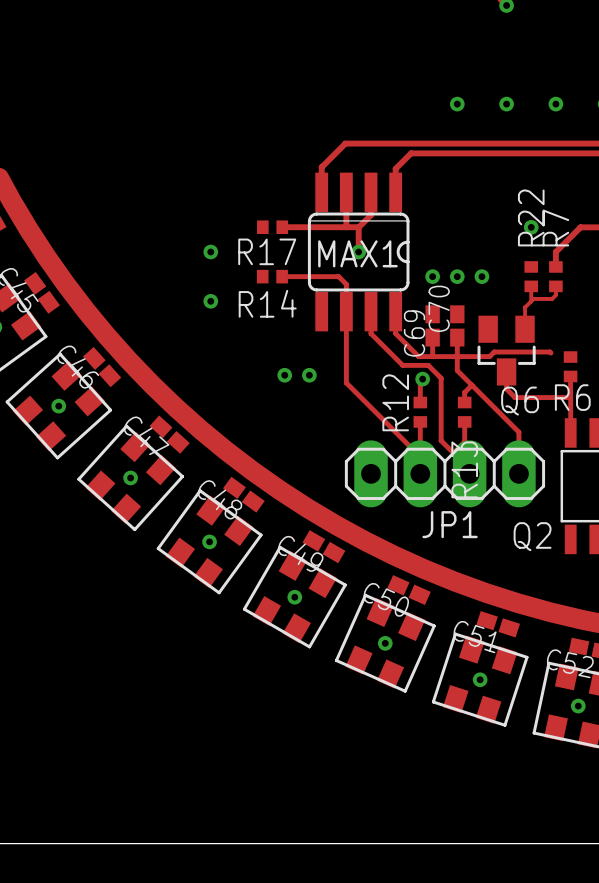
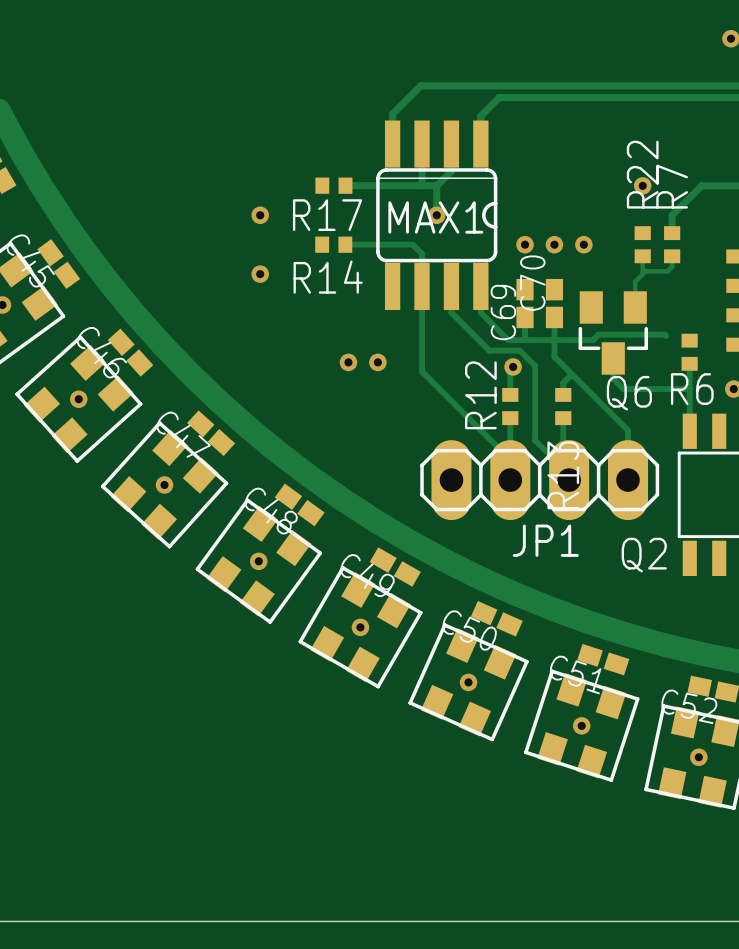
via: (457, 104) -> none
via: (506, 104) -> none
via: (555, 104) -> none

